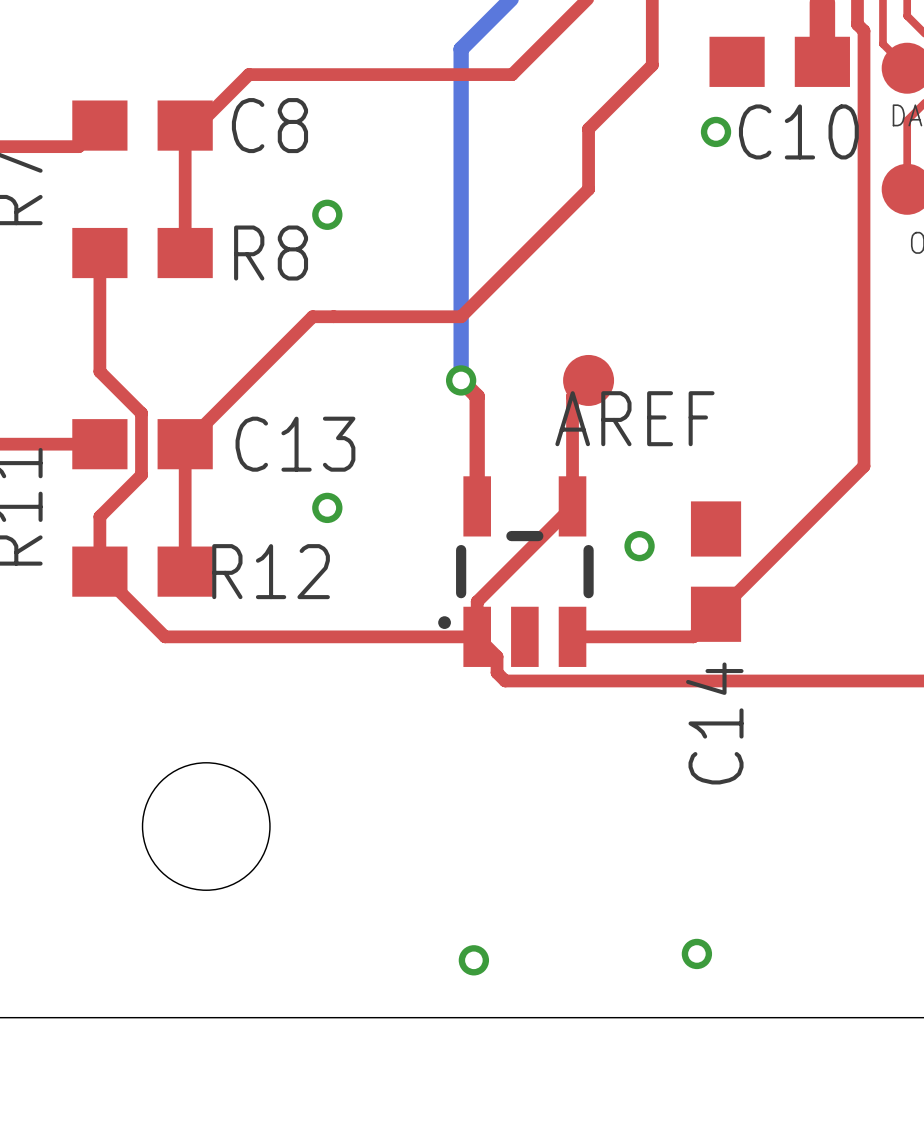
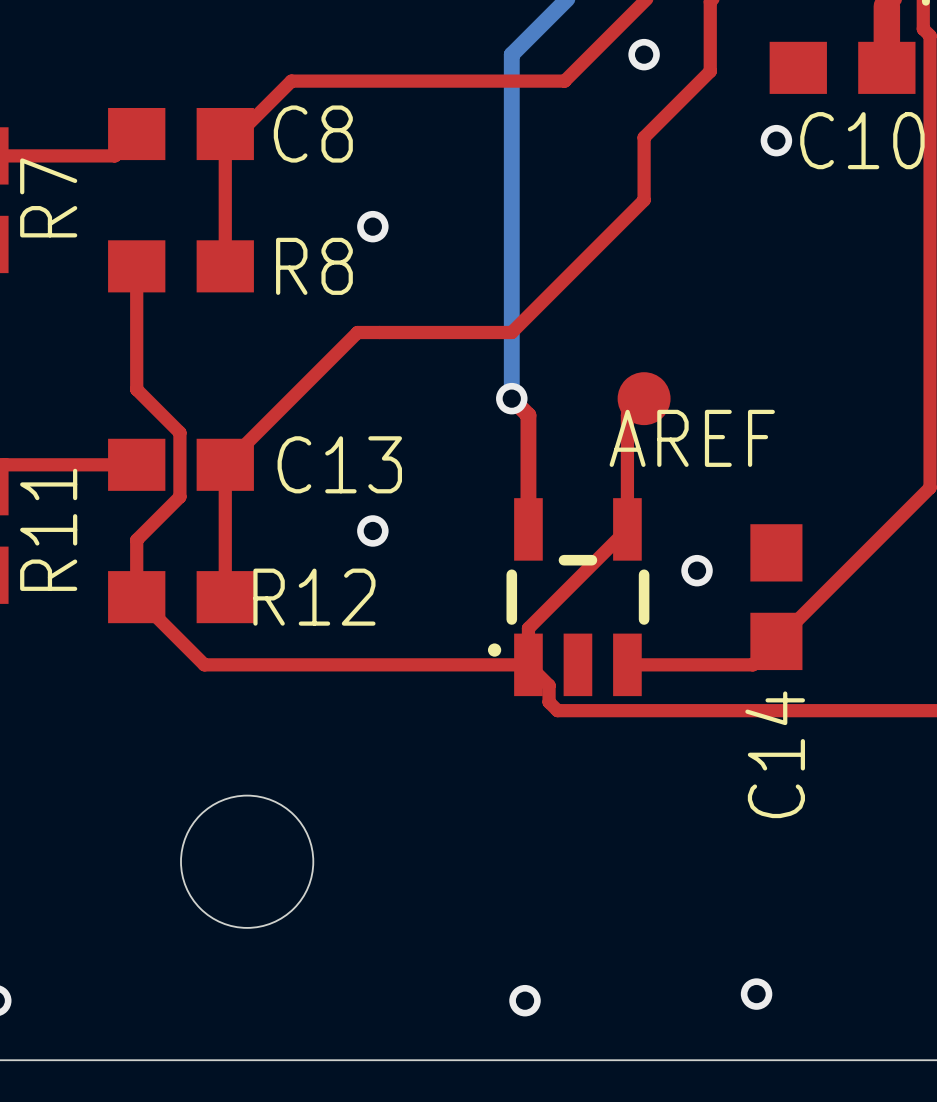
via: none -> (644, 54)

